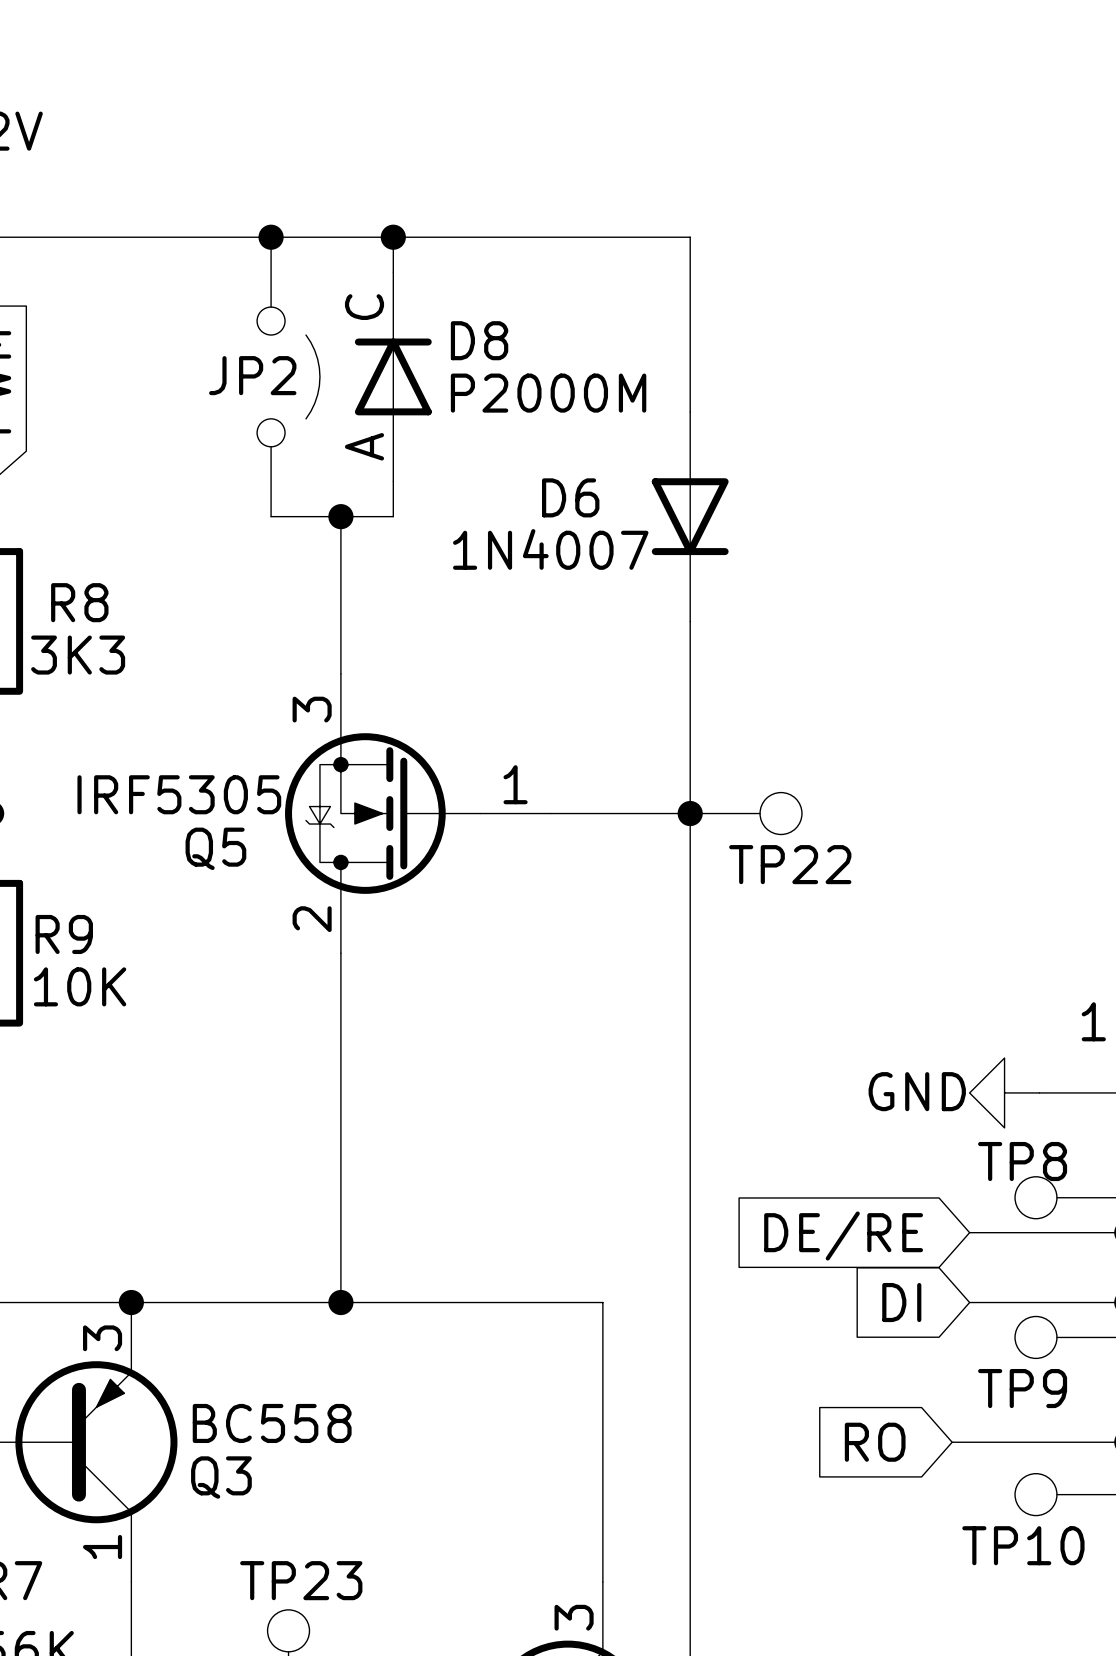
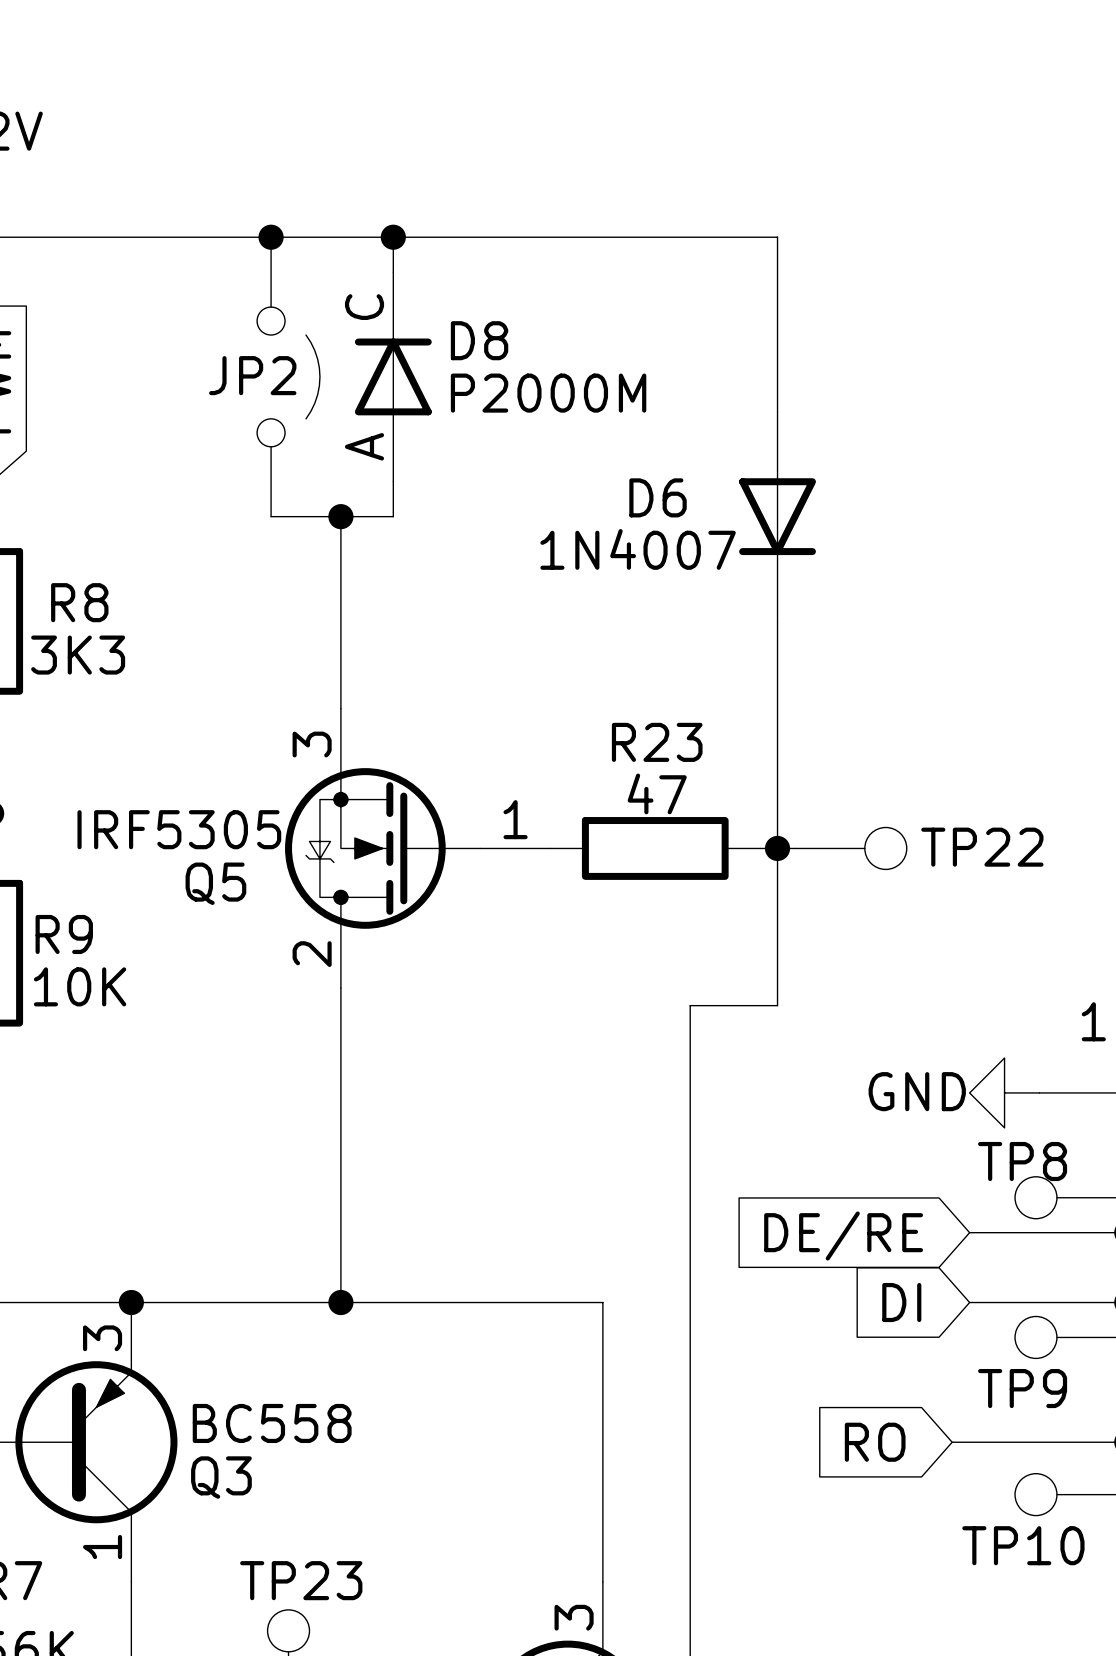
wire: (690, 237) (690, 411) -> (690, 237) (777, 237) (777, 411)
D6 position: (690, 516) -> (777, 516)
wire: (690, 621) (690, 1005) -> (777, 621) (777, 1005) (690, 1005)
Q5 position: (417, 813) -> (417, 848)
wire: (550, 813) (690, 813) -> none
junction position: (690, 813) -> (777, 848)
TP22 position: (746, 813) -> (850, 848)
R23: none -> 47 (655, 848)
TP22 name position: TP22 (790, 864) -> TP22 (982, 847)

